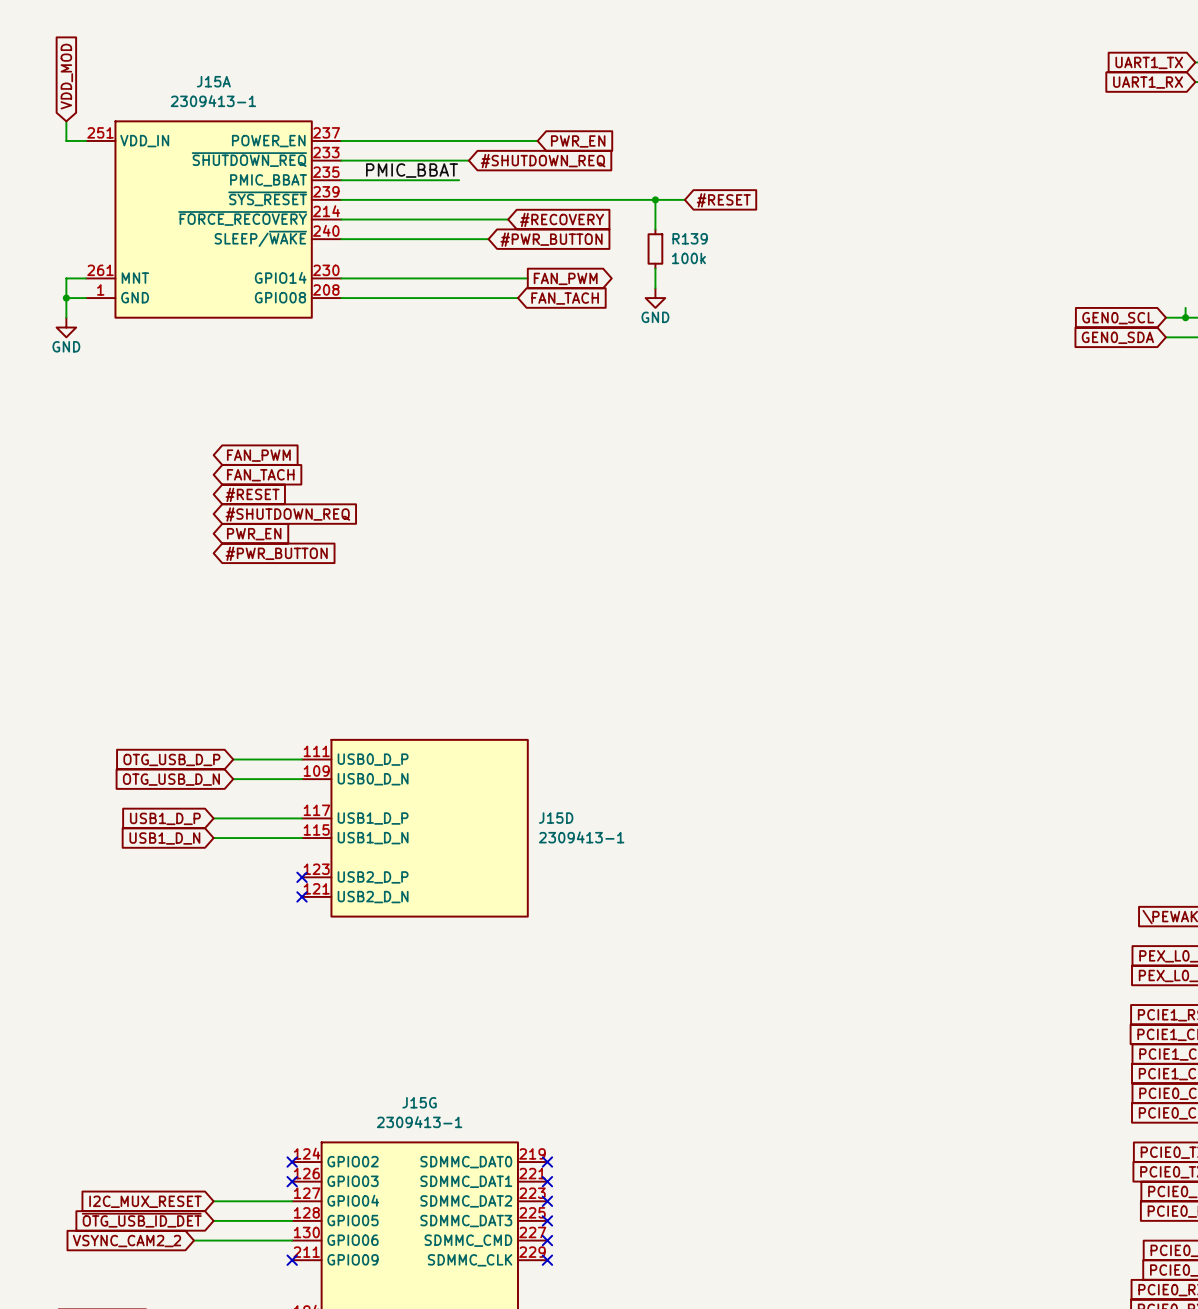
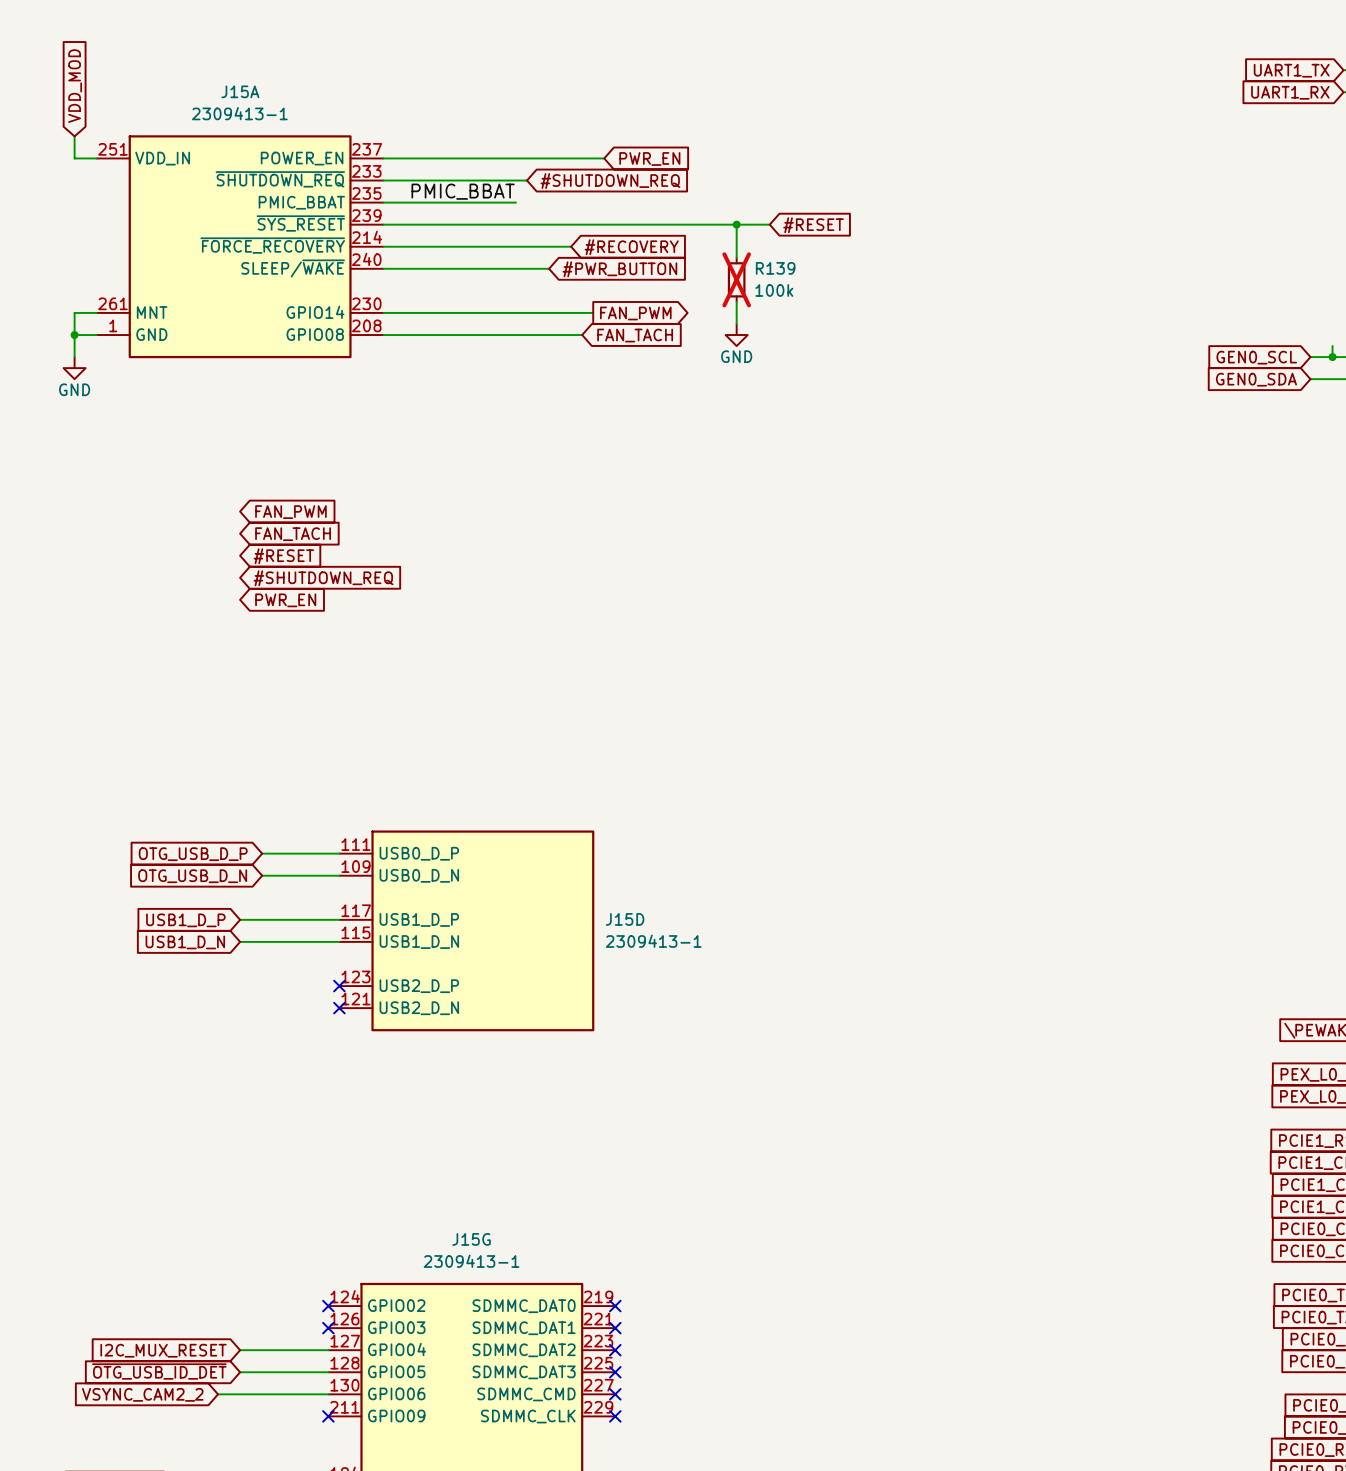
R139 do-not-place cross: none -> (736, 279)
global label: #PWR_BUTTON (276, 553) -> none

